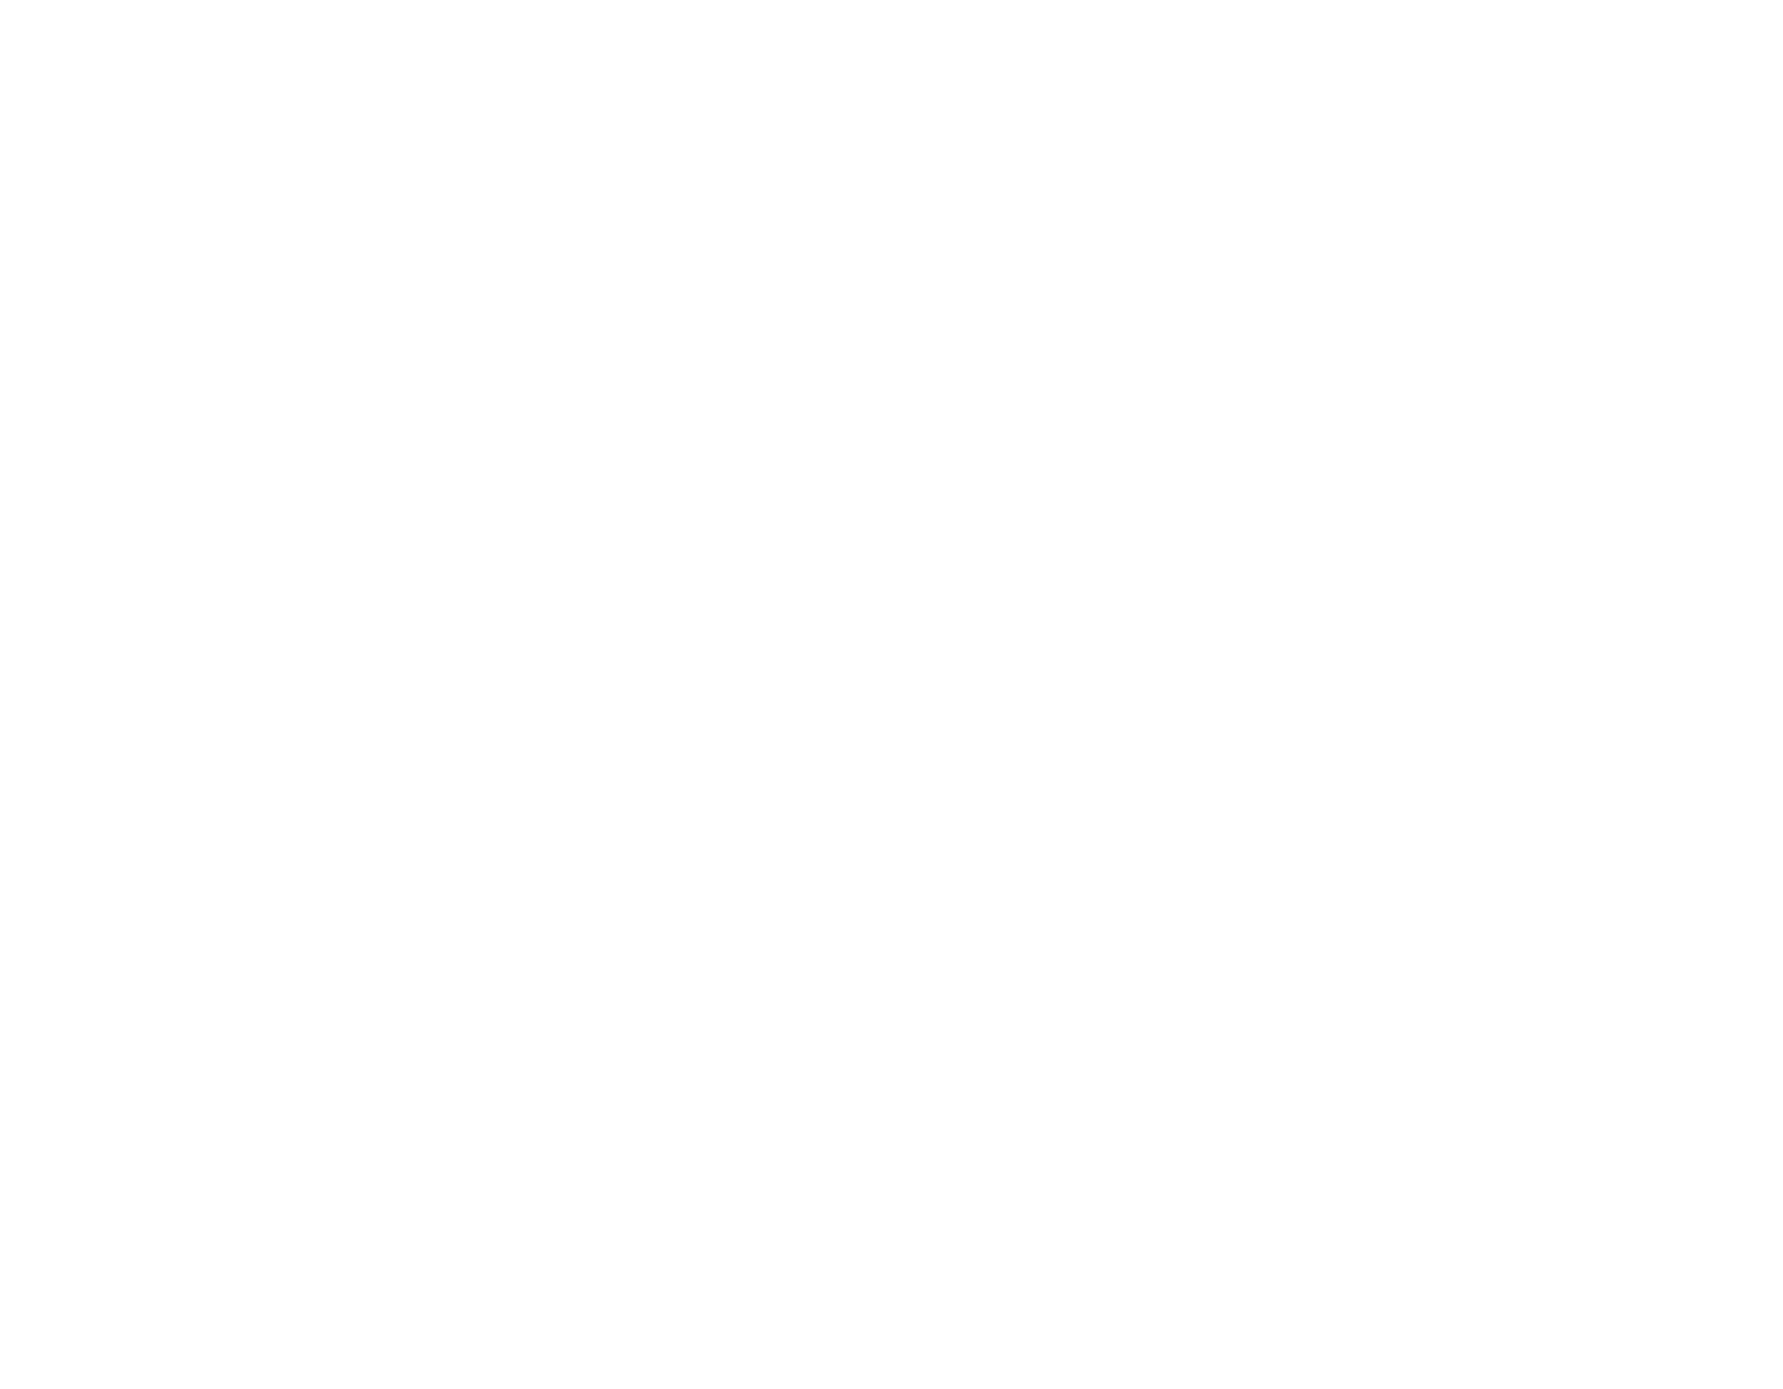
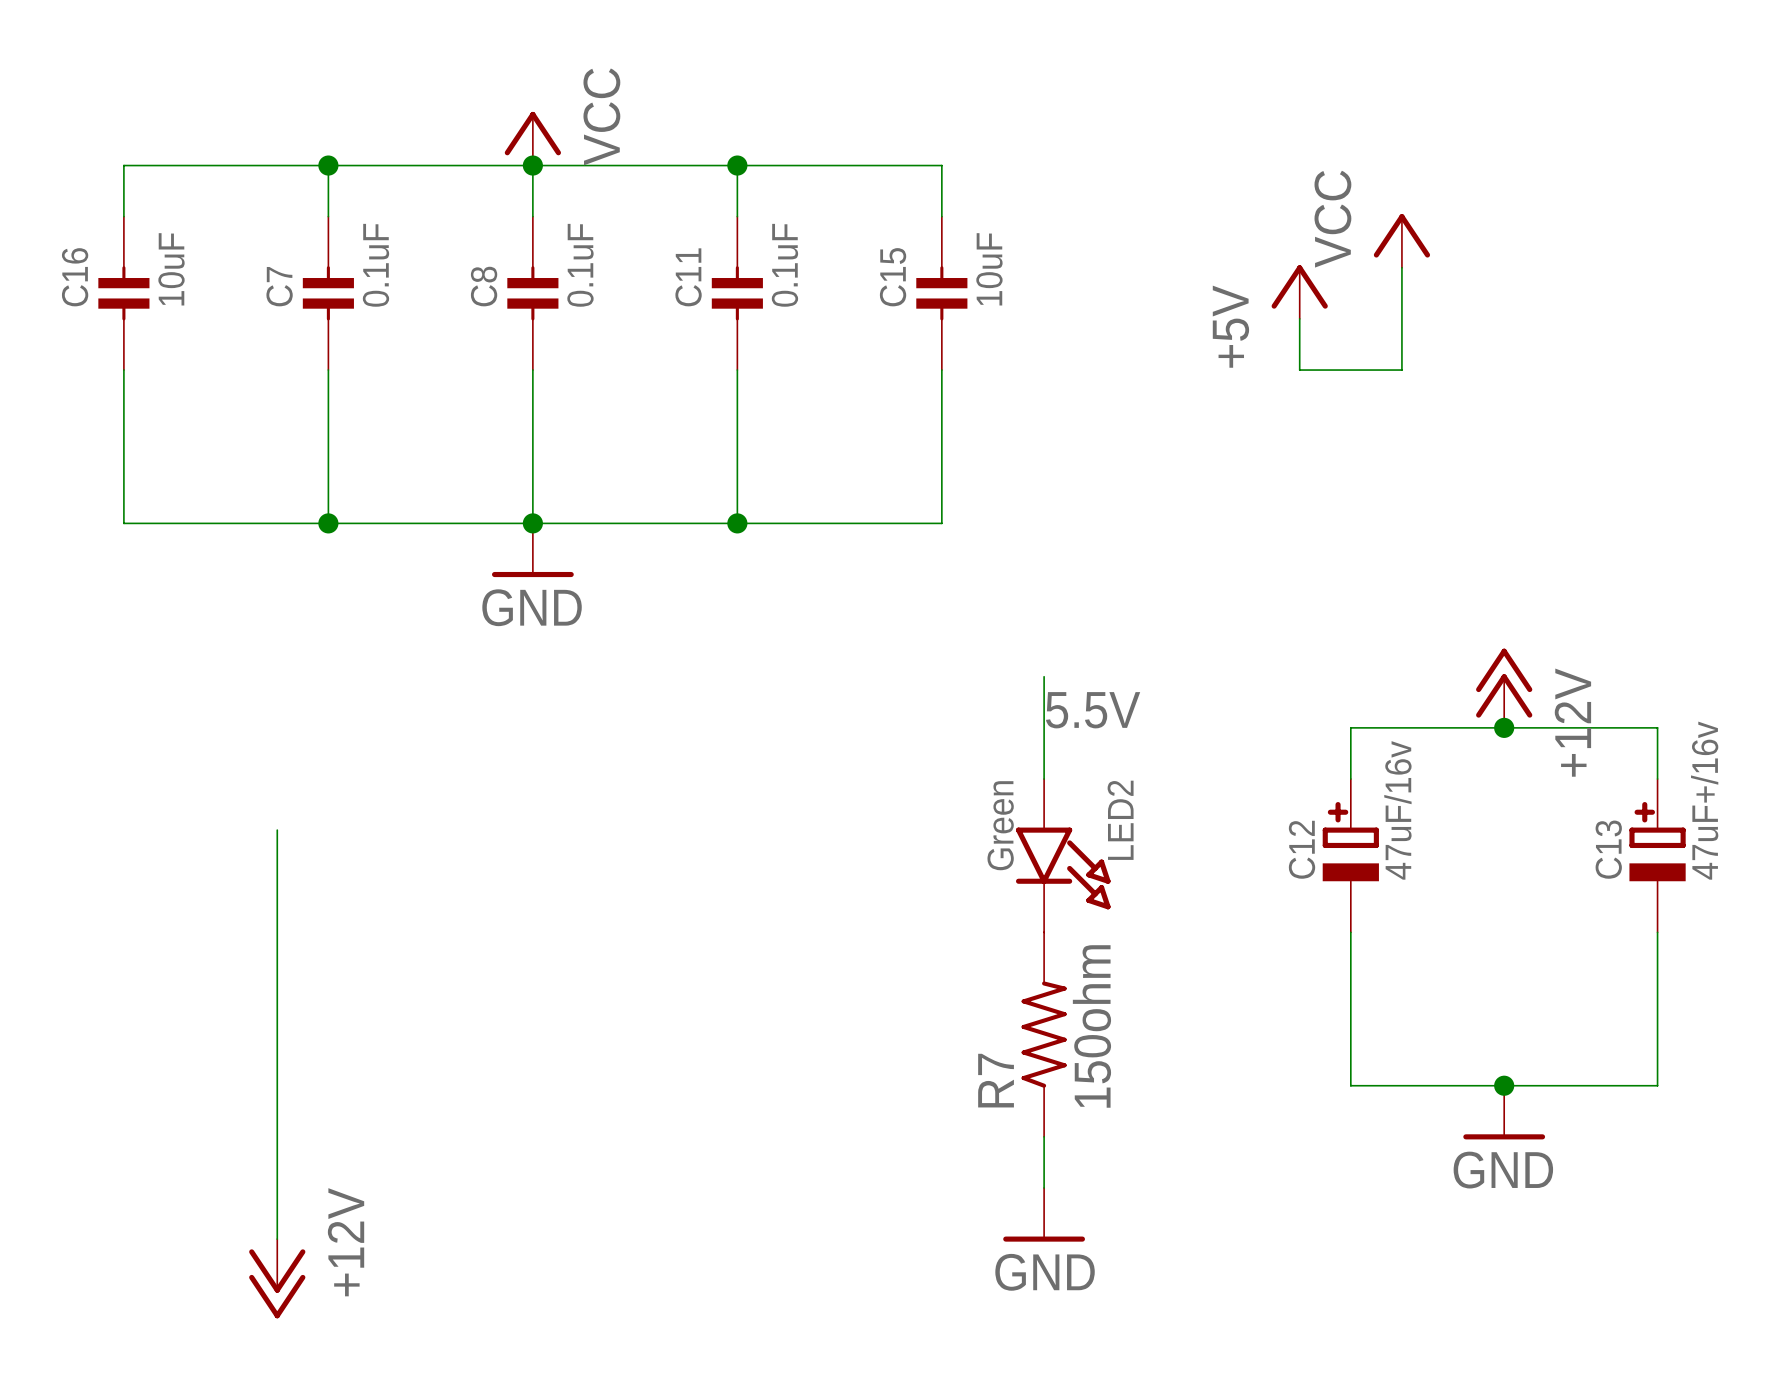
power symbol: none -> VCC (532, 138)
wire: none -> (328, 165) (328, 216)
junction: none -> (328, 165)
wire: none -> (532, 165) (532, 216)
junction: none -> (532, 165)
wire: none -> (737, 165) (737, 216)
junction: none -> (737, 165)
wire: none -> (123, 216) (123, 165) (941, 165) (941, 216)
power symbol: none -> VCC (1401, 240)
wire: none -> (1401, 267) (1401, 370) (1299, 370) (1299, 318)
power symbol: none -> +5V (1299, 292)
C16: none -> 10uF (123, 293)
C7: none -> 0.1uF (328, 293)
C8: none -> 0.1uF (532, 293)
C11: none -> 0.1uF (737, 293)
C15: none -> 10uF (941, 293)
wire: none -> (123, 370) (123, 523) (941, 523) (941, 370)
wire: none -> (328, 370) (328, 523)
wire: none -> (532, 370) (532, 523)
wire: none -> (737, 370) (737, 523)
junction: none -> (328, 523)
junction: none -> (532, 523)
junction: none -> (737, 523)
power symbol: none -> GND (532, 550)
wire: none -> (1044, 676) (1044, 779)
power symbol: none -> +12V (1504, 688)
label: none -> 5.5V (1093, 710)
junction: none -> (1504, 727)
wire: none -> (1350, 779) (1350, 727) (1657, 727) (1657, 779)
wire: none -> (277, 830) (277, 1239)
LED2: none -> Green (1063, 855)
C12: none -> 47uF/16v (1350, 855)
C13: none -> 47uF+/16v (1657, 855)
wire: none -> (1350, 932) (1350, 1085) (1657, 1085) (1657, 932)
R7: none -> 150ohm (1044, 1034)
junction: none -> (1504, 1085)
power symbol: none -> GND (1504, 1112)
wire: none -> (1044, 1136) (1044, 1187)
power symbol: none -> GND (1044, 1214)
power symbol: none -> +12V (277, 1278)

